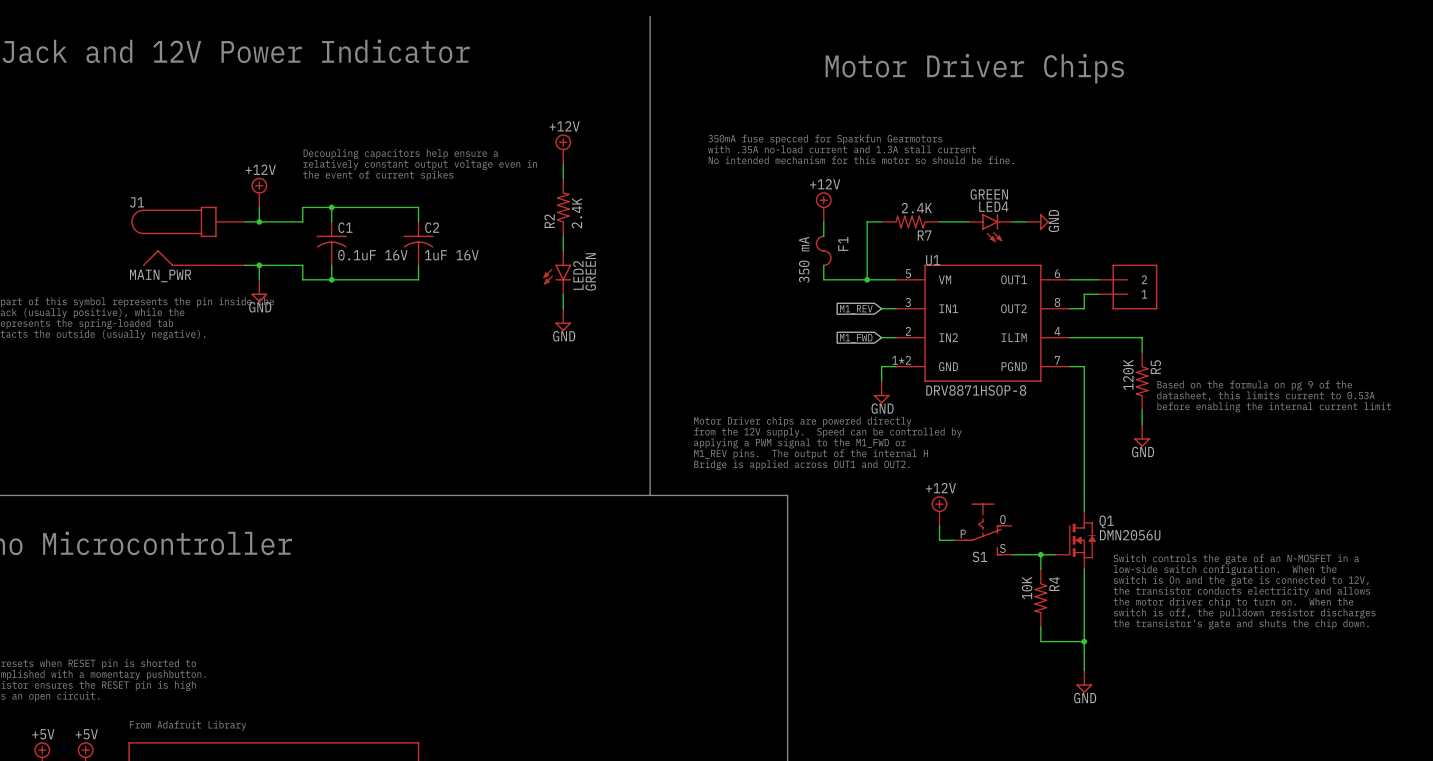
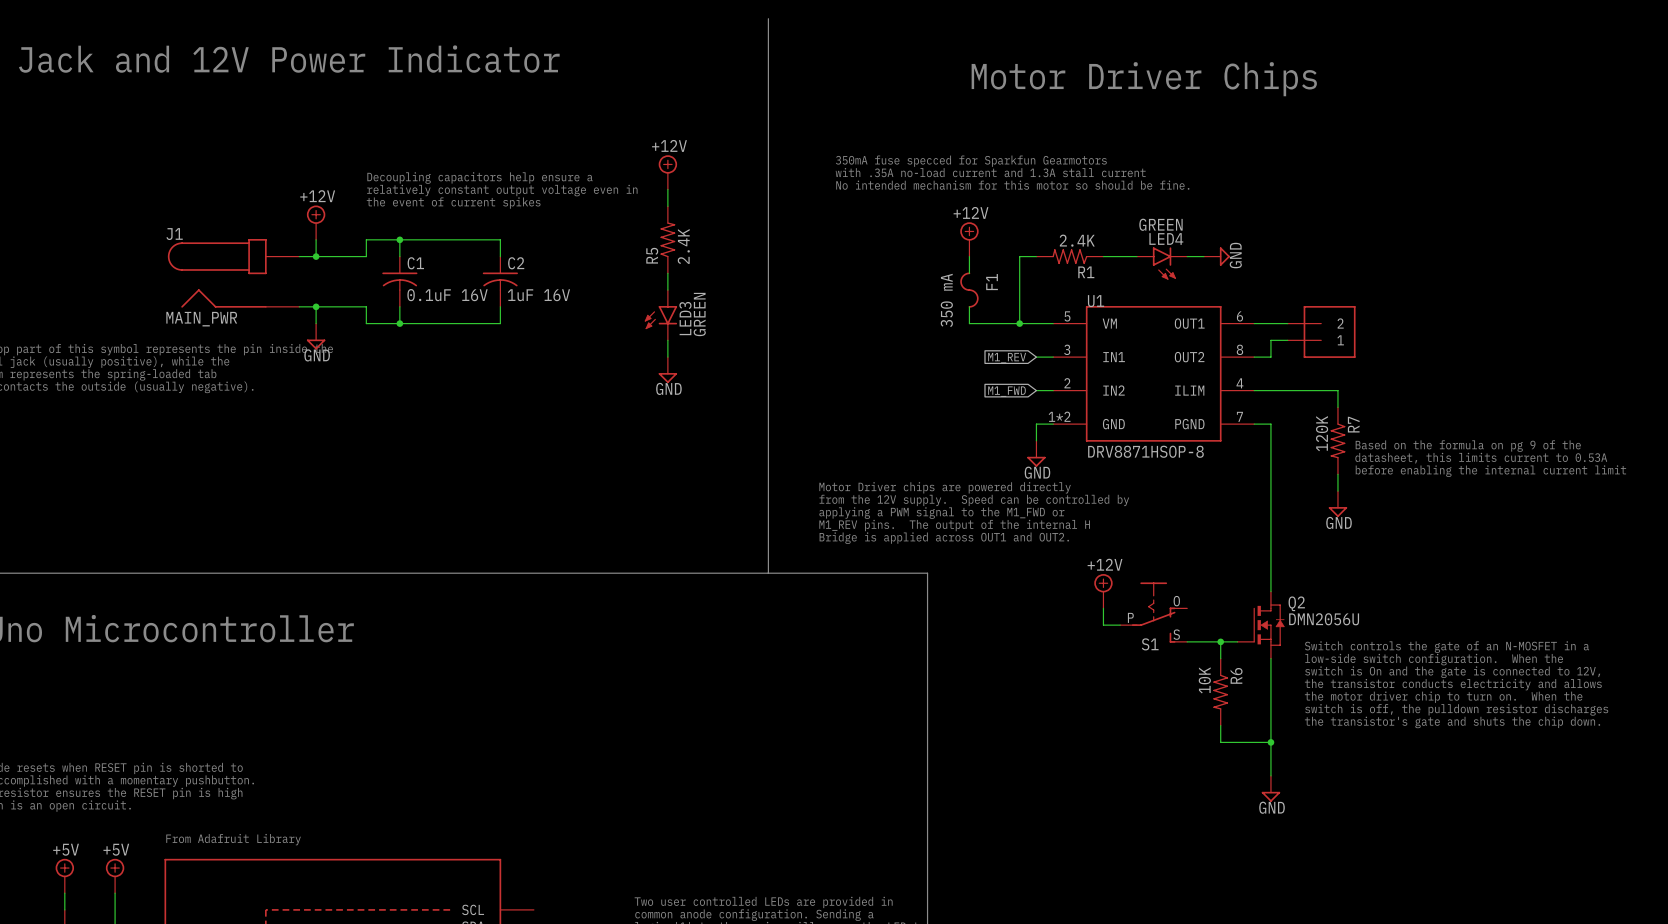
R2 name: R2 (549, 221) -> R5 (652, 255)
R7 name: R7 (924, 235) -> R1 (1086, 272)
LED2 name: LED2 (578, 275) -> LED3 (685, 318)
R5 name: R5 (1155, 367) -> R7 (1353, 424)
Q1 name: Q1 (1106, 521) -> Q2 (1296, 603)
R4 name: R4 (1054, 583) -> R6 (1236, 675)

